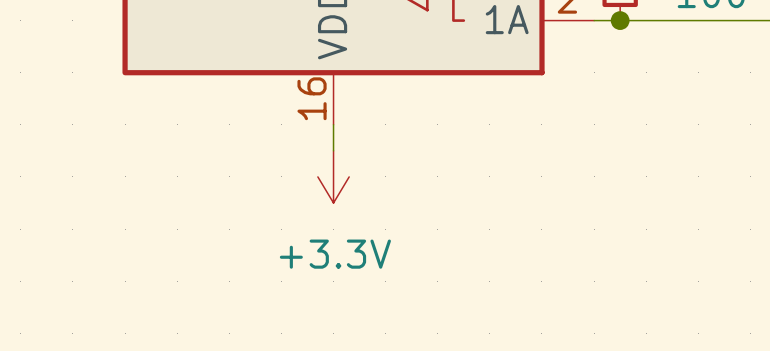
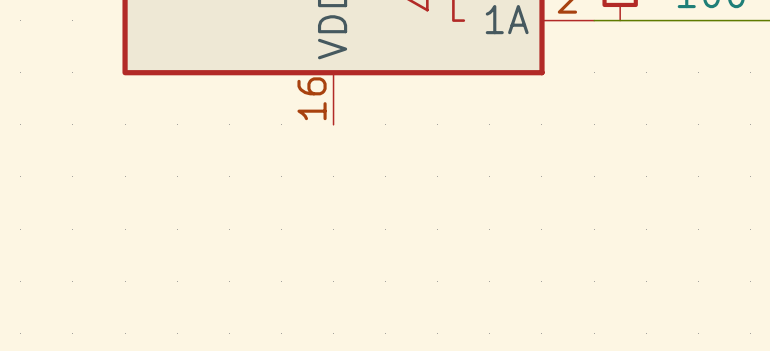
junction: (620, 20) -> none
wire: (333, 124) (333, 150) -> none
power symbol: +3.3V (333, 176) -> none

